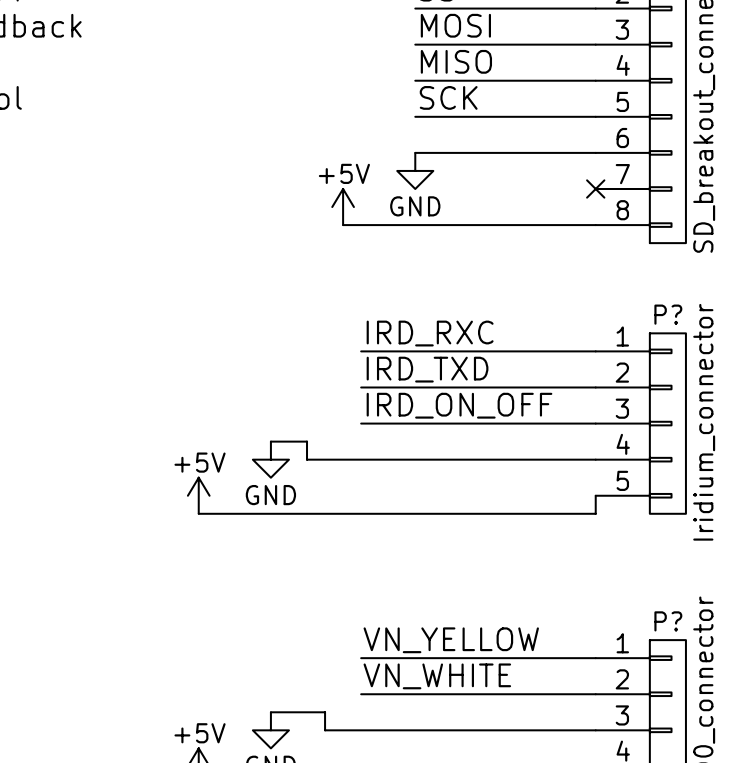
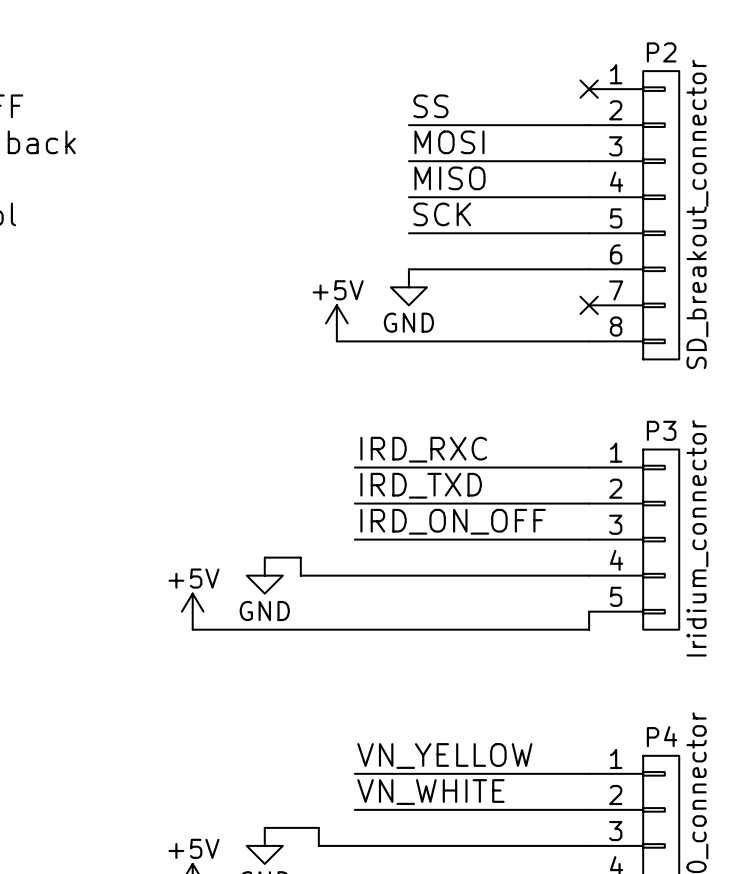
P? name: P? (668, 314) -> P3 (661, 430)
P? name: P? (668, 621) -> P4 (662, 736)

